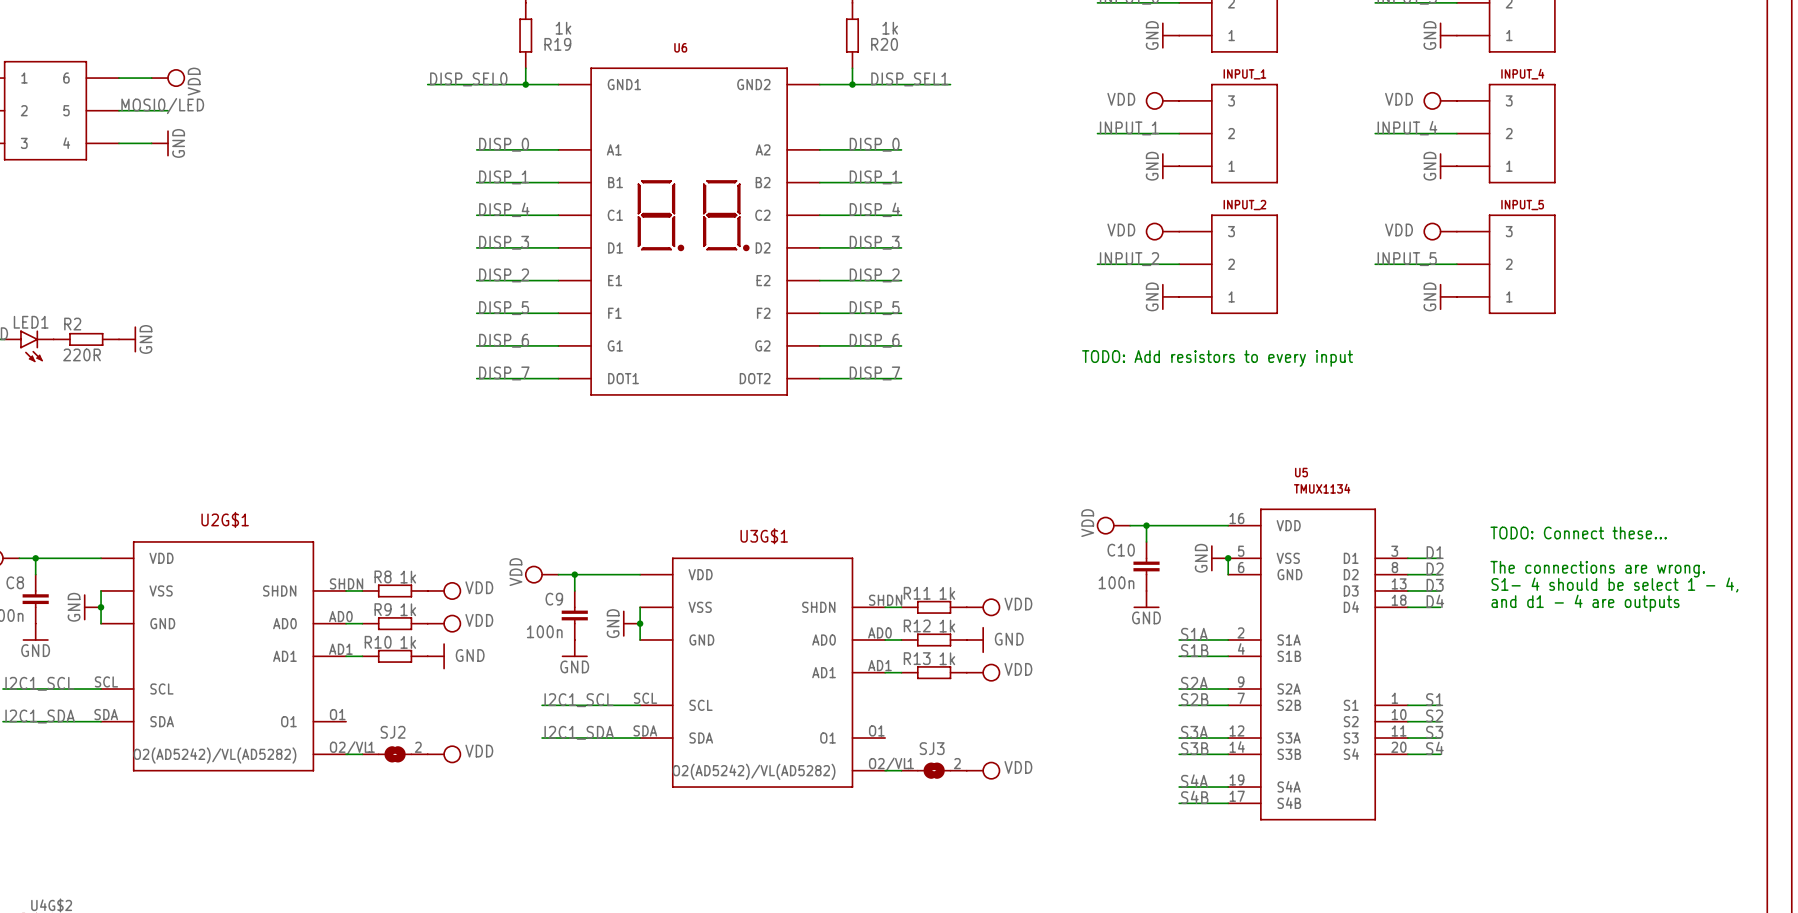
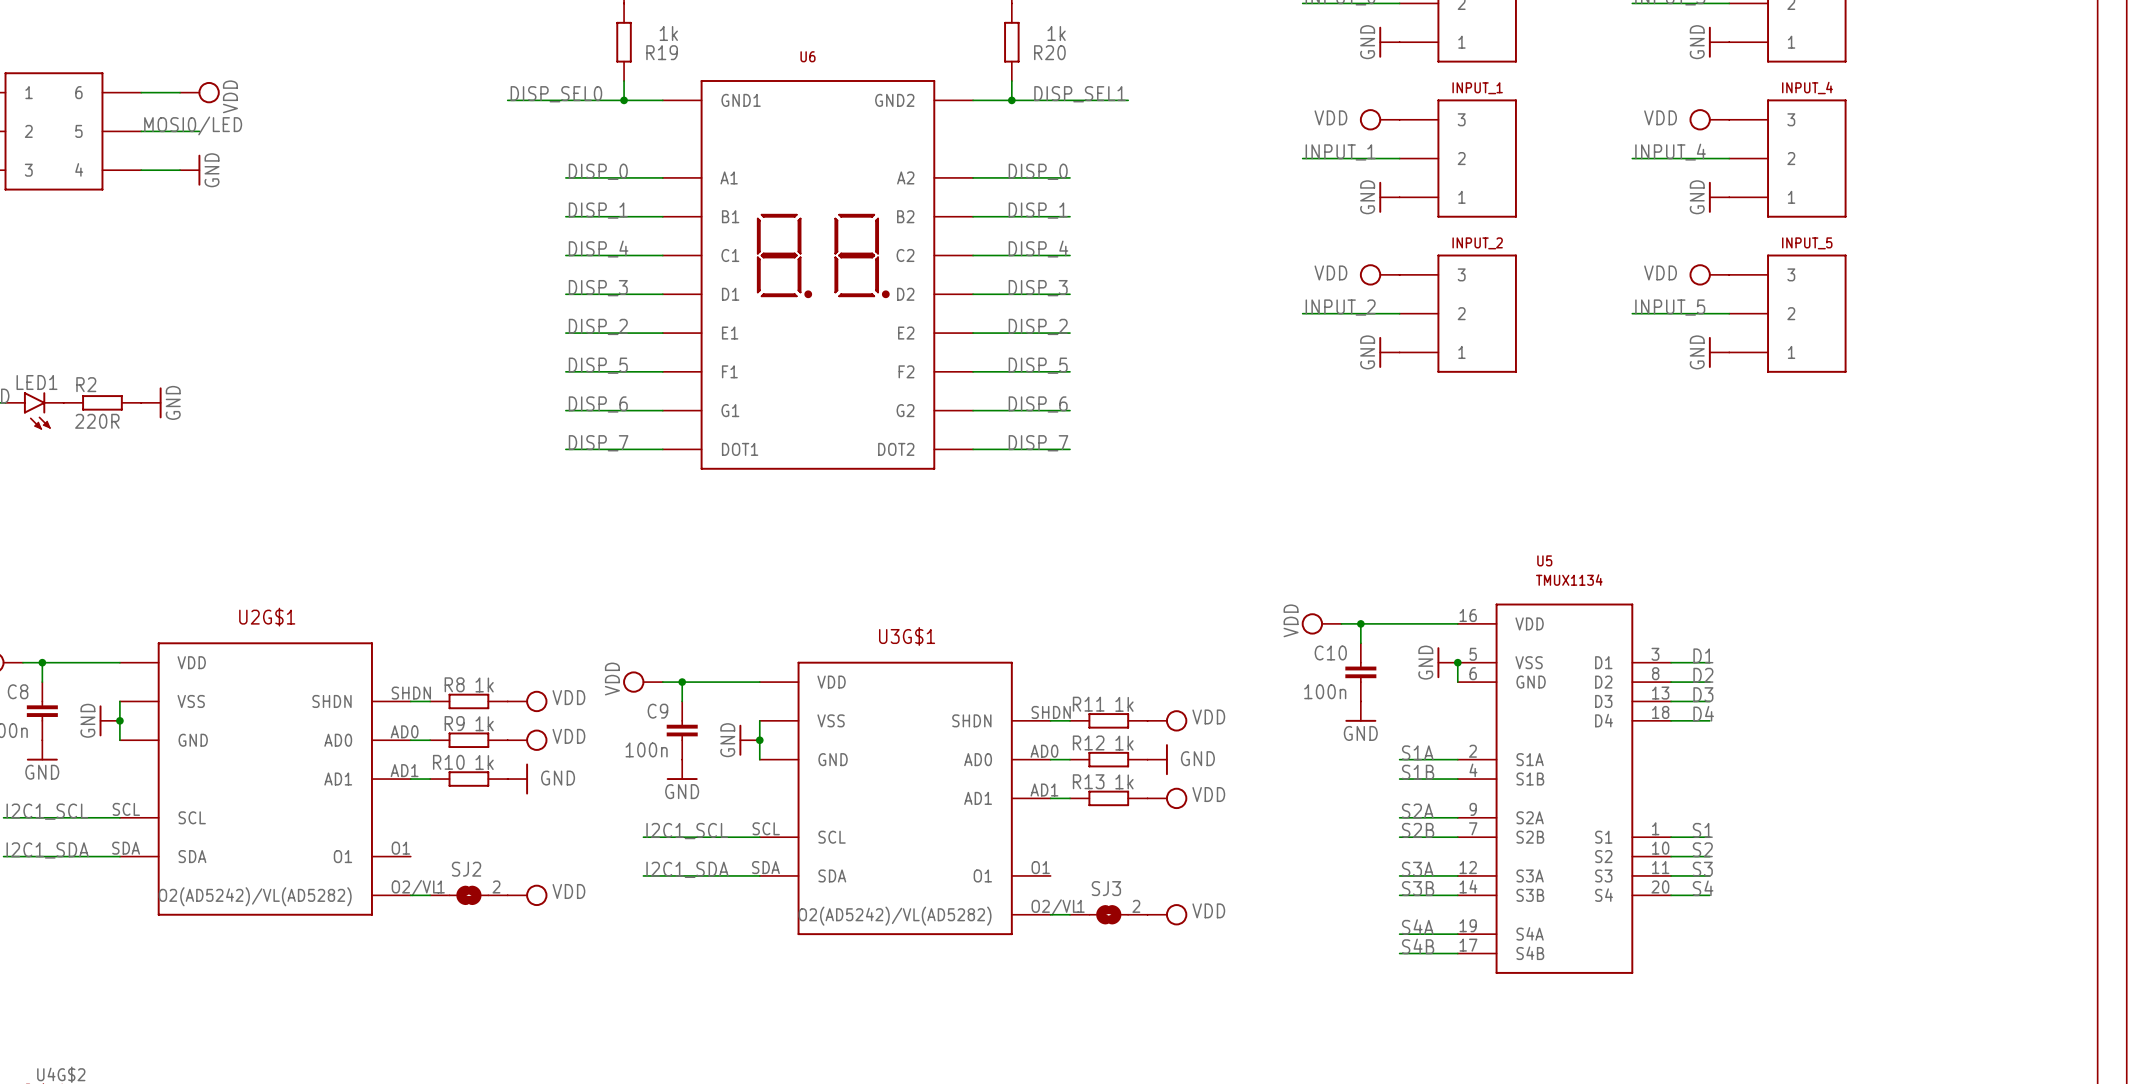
text: TODO: Add resistors to every input (1217, 358) -> none
text: TODO: Connect these... (1578, 532) -> none
text: The connections are wrong. (1597, 569) -> none
text: S1- 4 should be select 1 - 4, (1614, 584) -> none
text: and d1 - 4 are outputs (1585, 603) -> none

